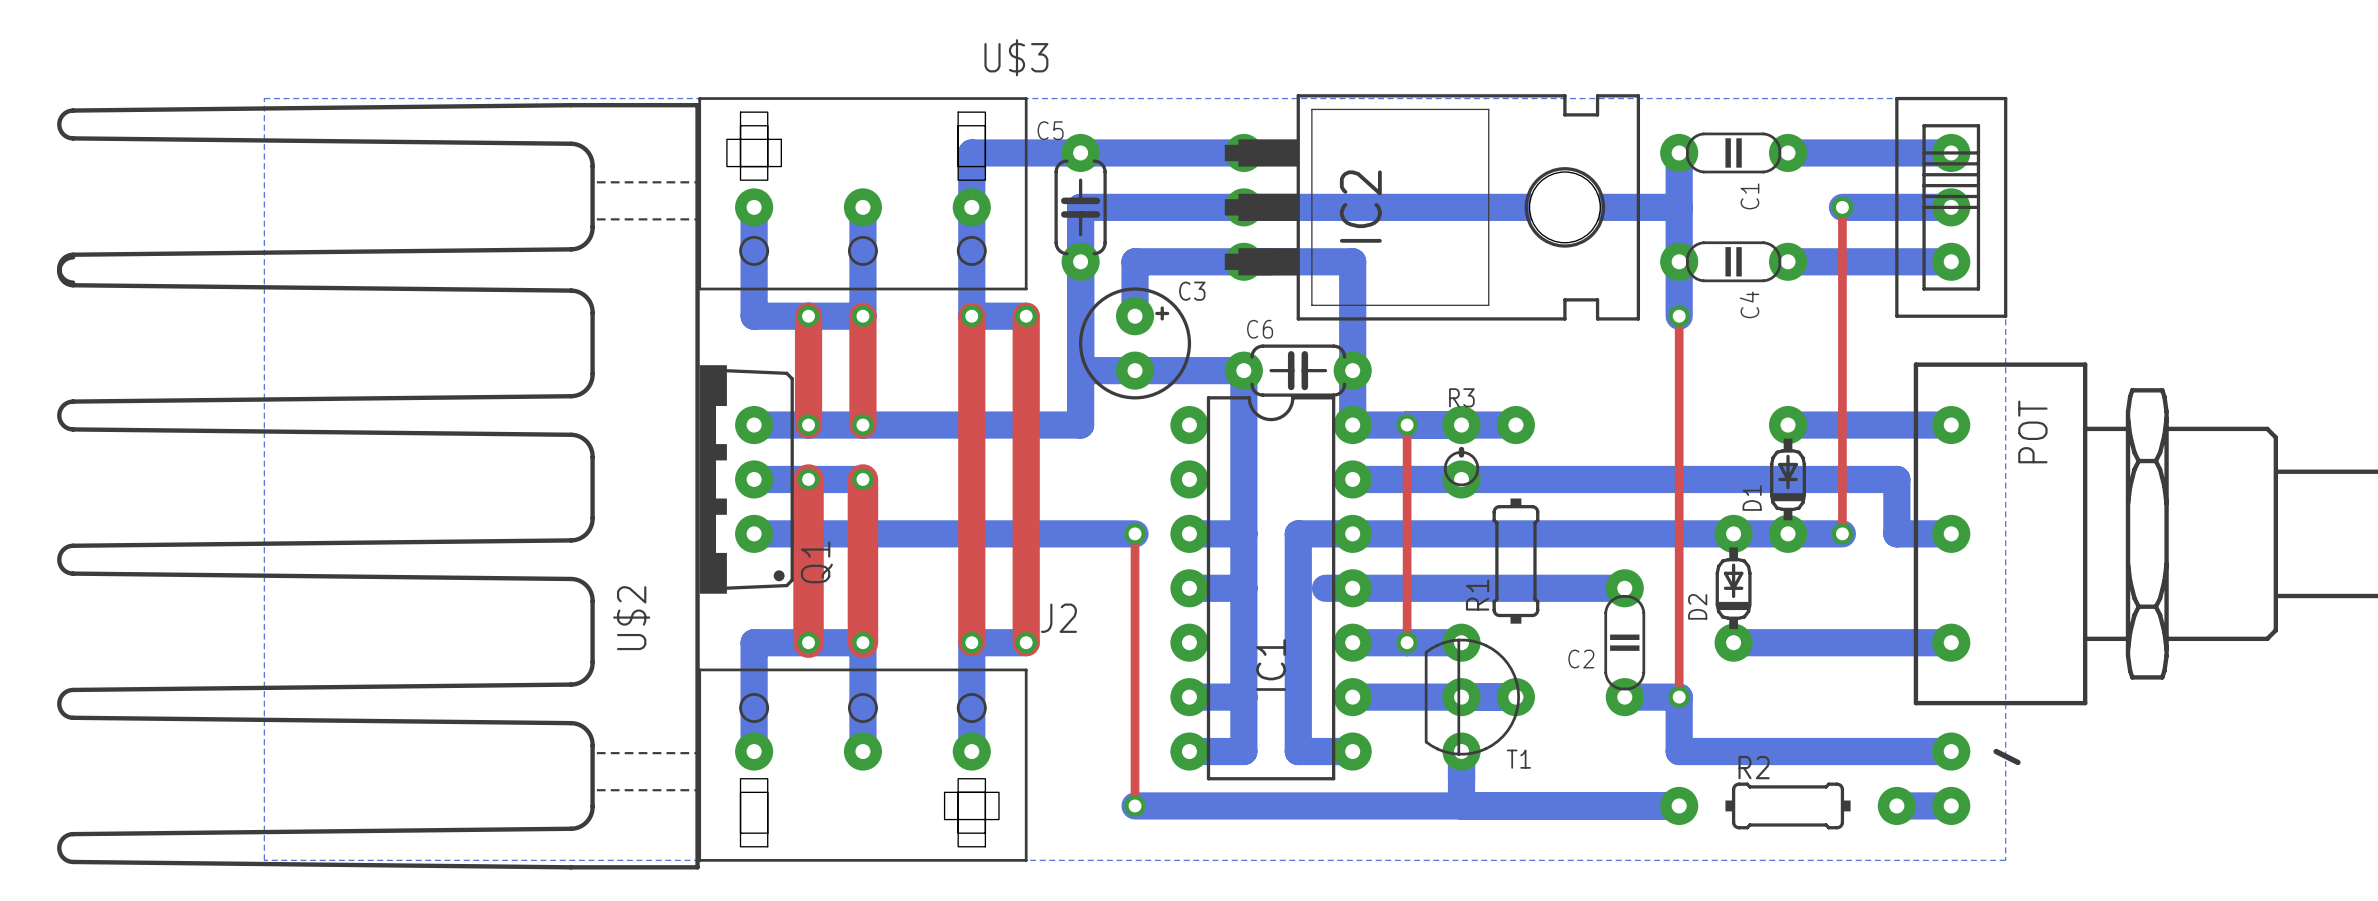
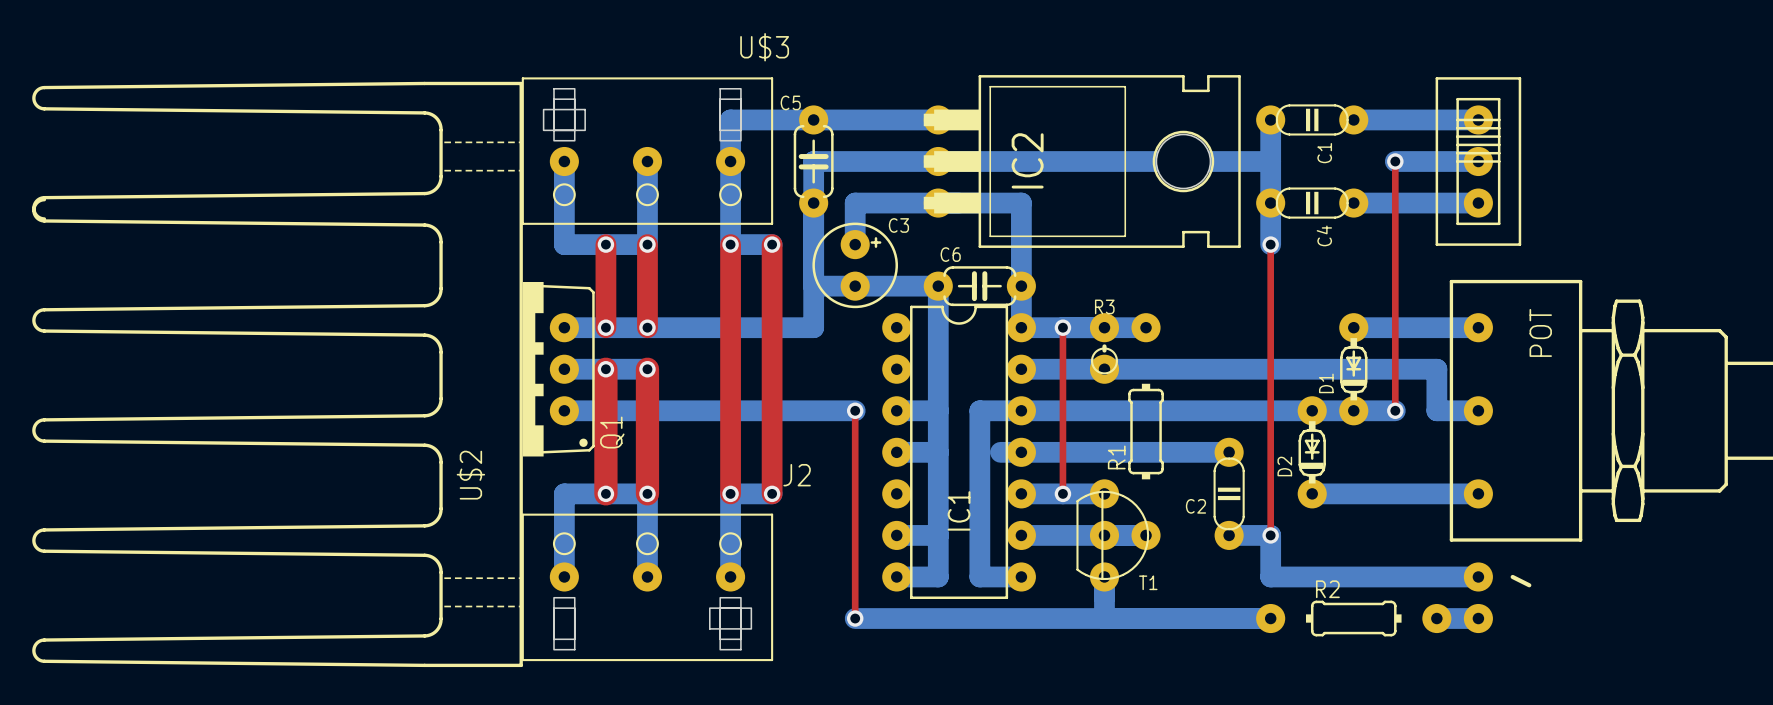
bottom zone outline: (264, 98) (264, 860) (2005, 860) (2005, 98) (264, 98) -> none

